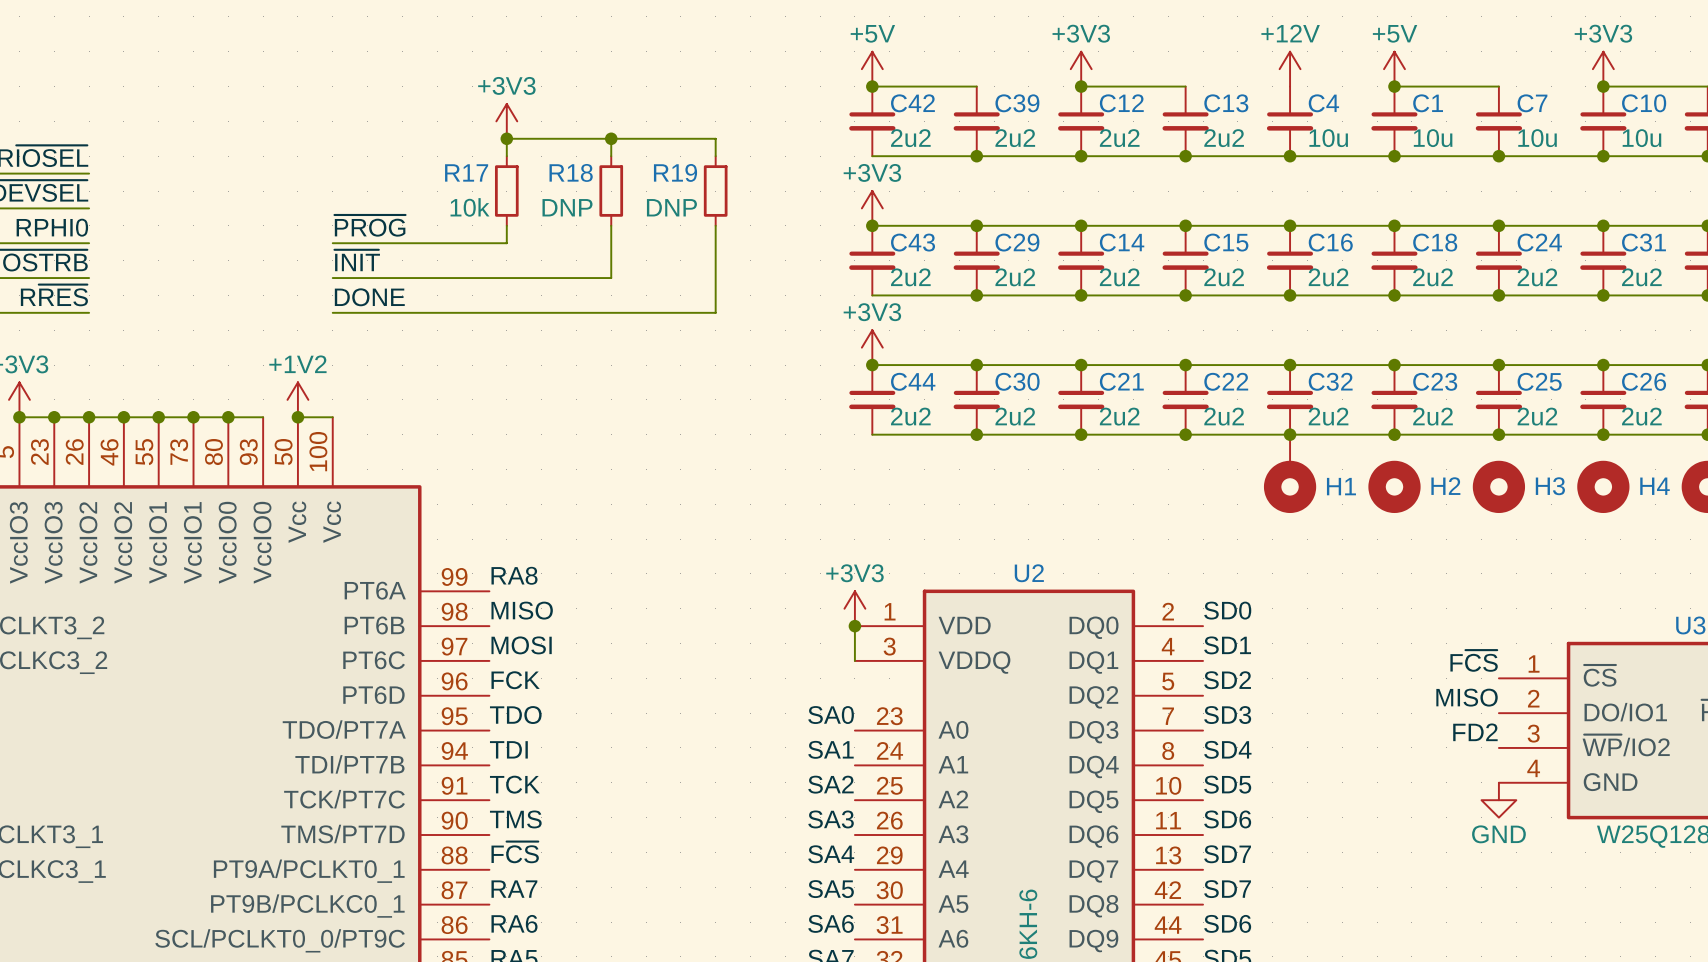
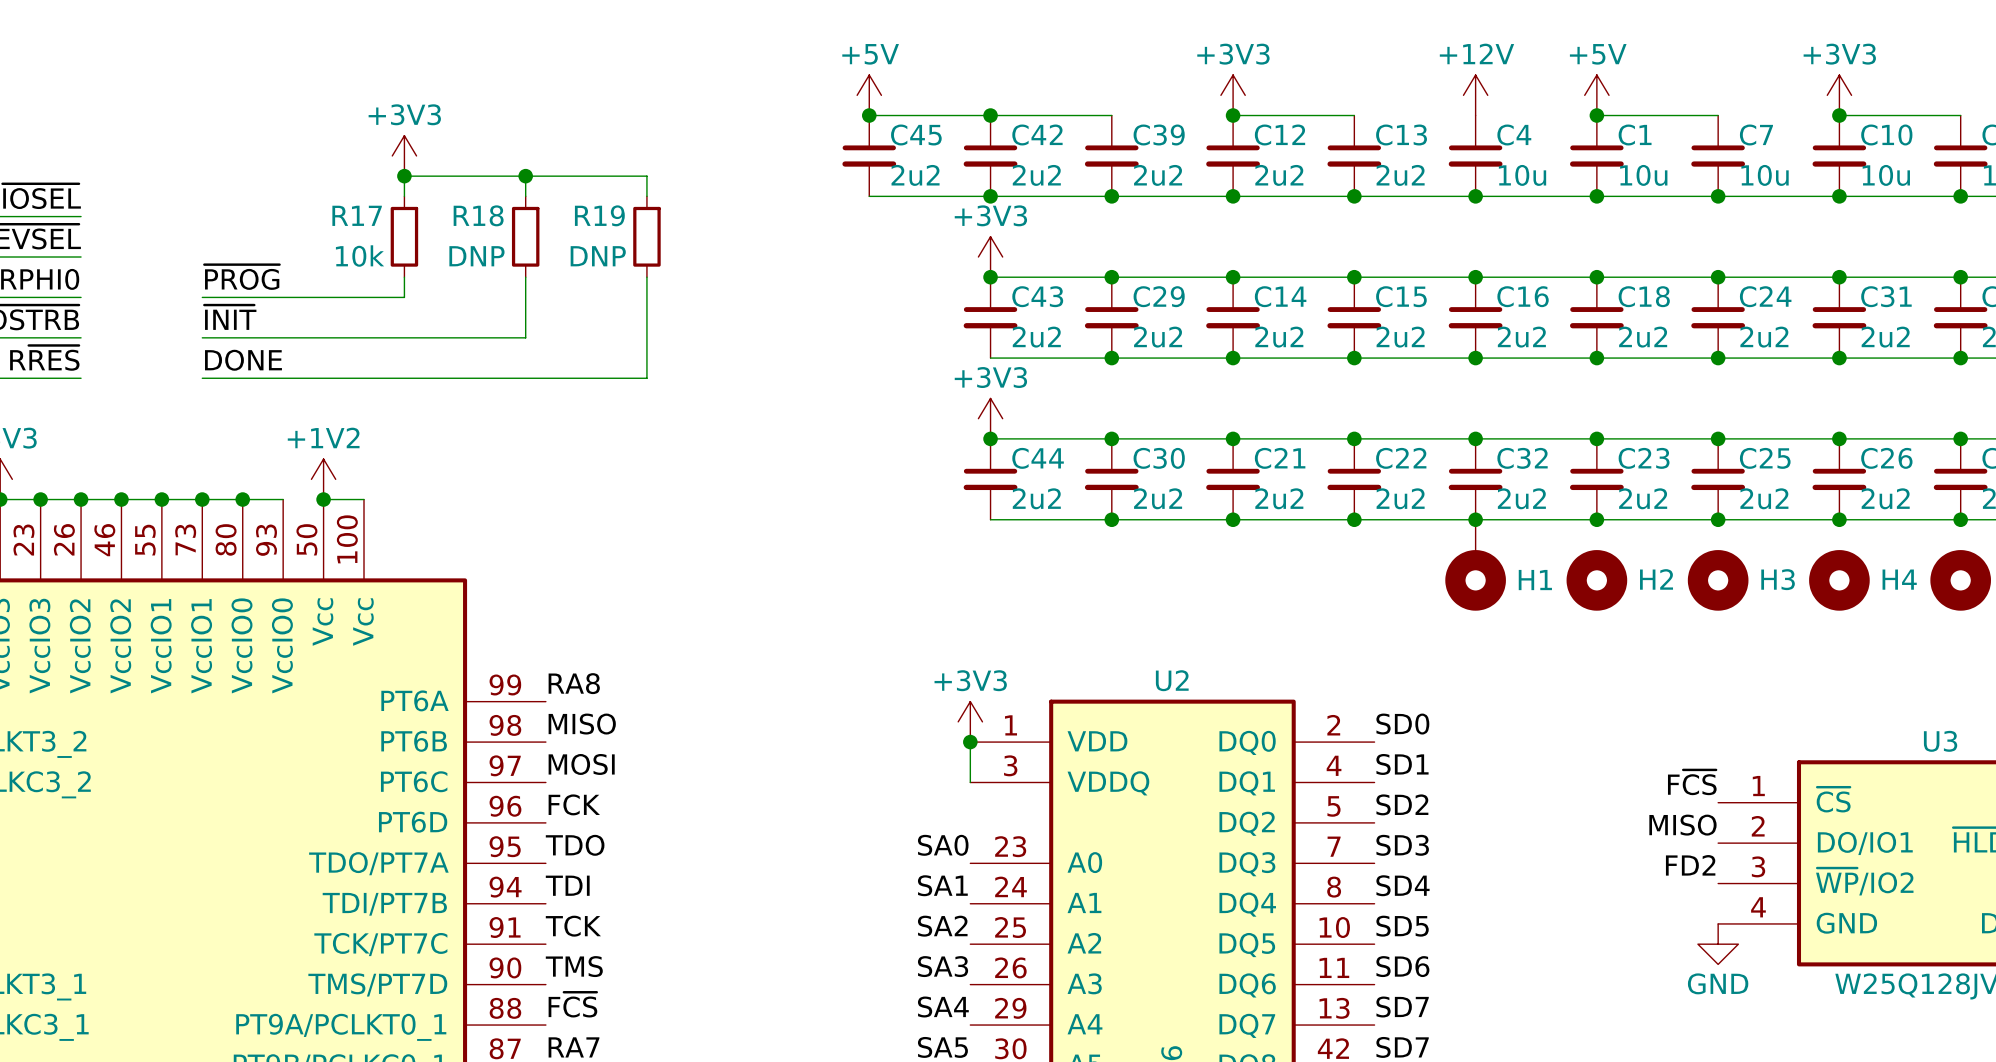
power symbol position: +5V (872, 69) -> +5V (869, 95)
wire: none -> (869, 115) (990, 115)
junction: none -> (869, 115)
power symbol position: +3V3 (506, 121) -> +3V3 (404, 155)
C45: none -> 2u2 (869, 155)
junction: none -> (404, 176)
wire: (506, 138) (506, 156) -> (566, 176) (404, 176) (404, 196)
junction position: (506, 138) -> (525, 176)
wire: (576, 138) (715, 138) (715, 156) -> (646, 176) (646, 196)
wire: (611, 138) (611, 156) -> (525, 176) (525, 196)
junction: (611, 138) -> none
wire: none -> (869, 196) (990, 196)
junction: none -> (990, 196)
R17 position: (506, 191) -> (404, 236)
R18 position: (611, 191) -> (525, 236)
R19 position: (715, 191) -> (646, 236)
label position: ~{PROG} (370, 225) -> ~{PROG} (241, 277)
wire: (506, 225) (506, 243) (367, 243) -> (404, 277) (404, 297)
wire: (611, 225) (611, 278) (472, 278) -> (525, 277) (525, 337)
wire: (715, 225) (715, 312) (576, 312) -> (646, 277) (646, 378)
wire: none -> (202, 297) (363, 297)
label position: ~{INIT} (357, 260) -> ~{INIT} (230, 317)
wire: none -> (202, 337) (363, 337)
label position: DONE (369, 297) -> DONE (243, 360)
wire: none -> (202, 378) (363, 378)

